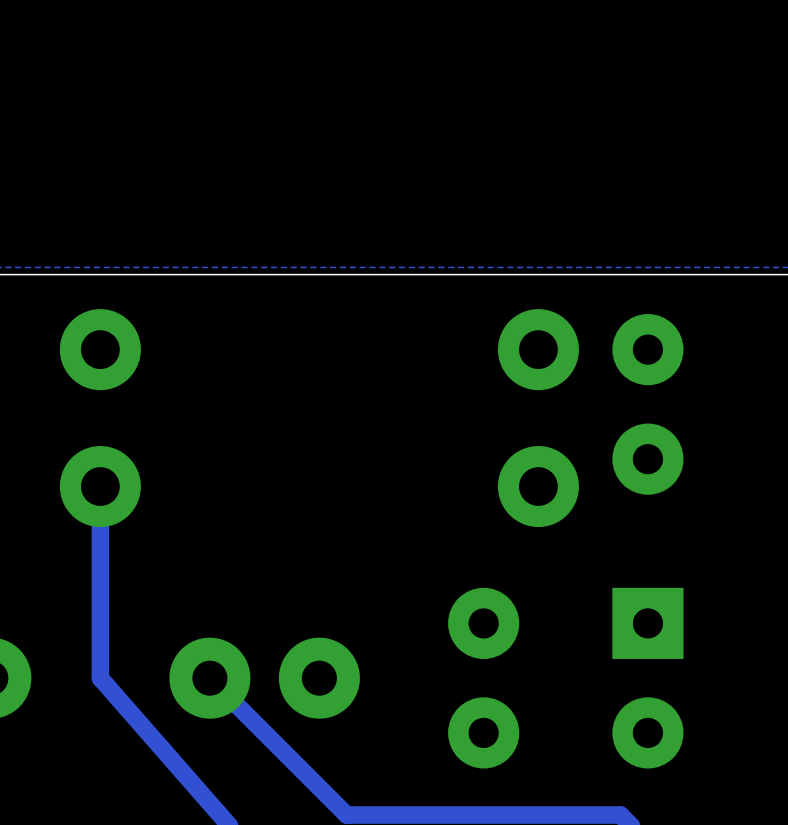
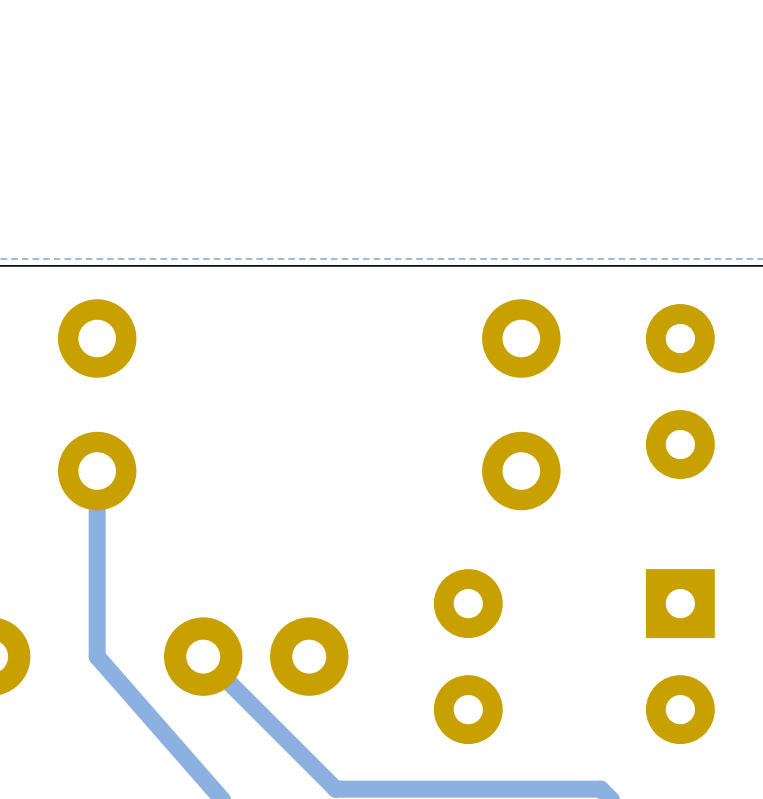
part position: (647, 404) -> (680, 391)
part position: (647, 678) -> (680, 656)

